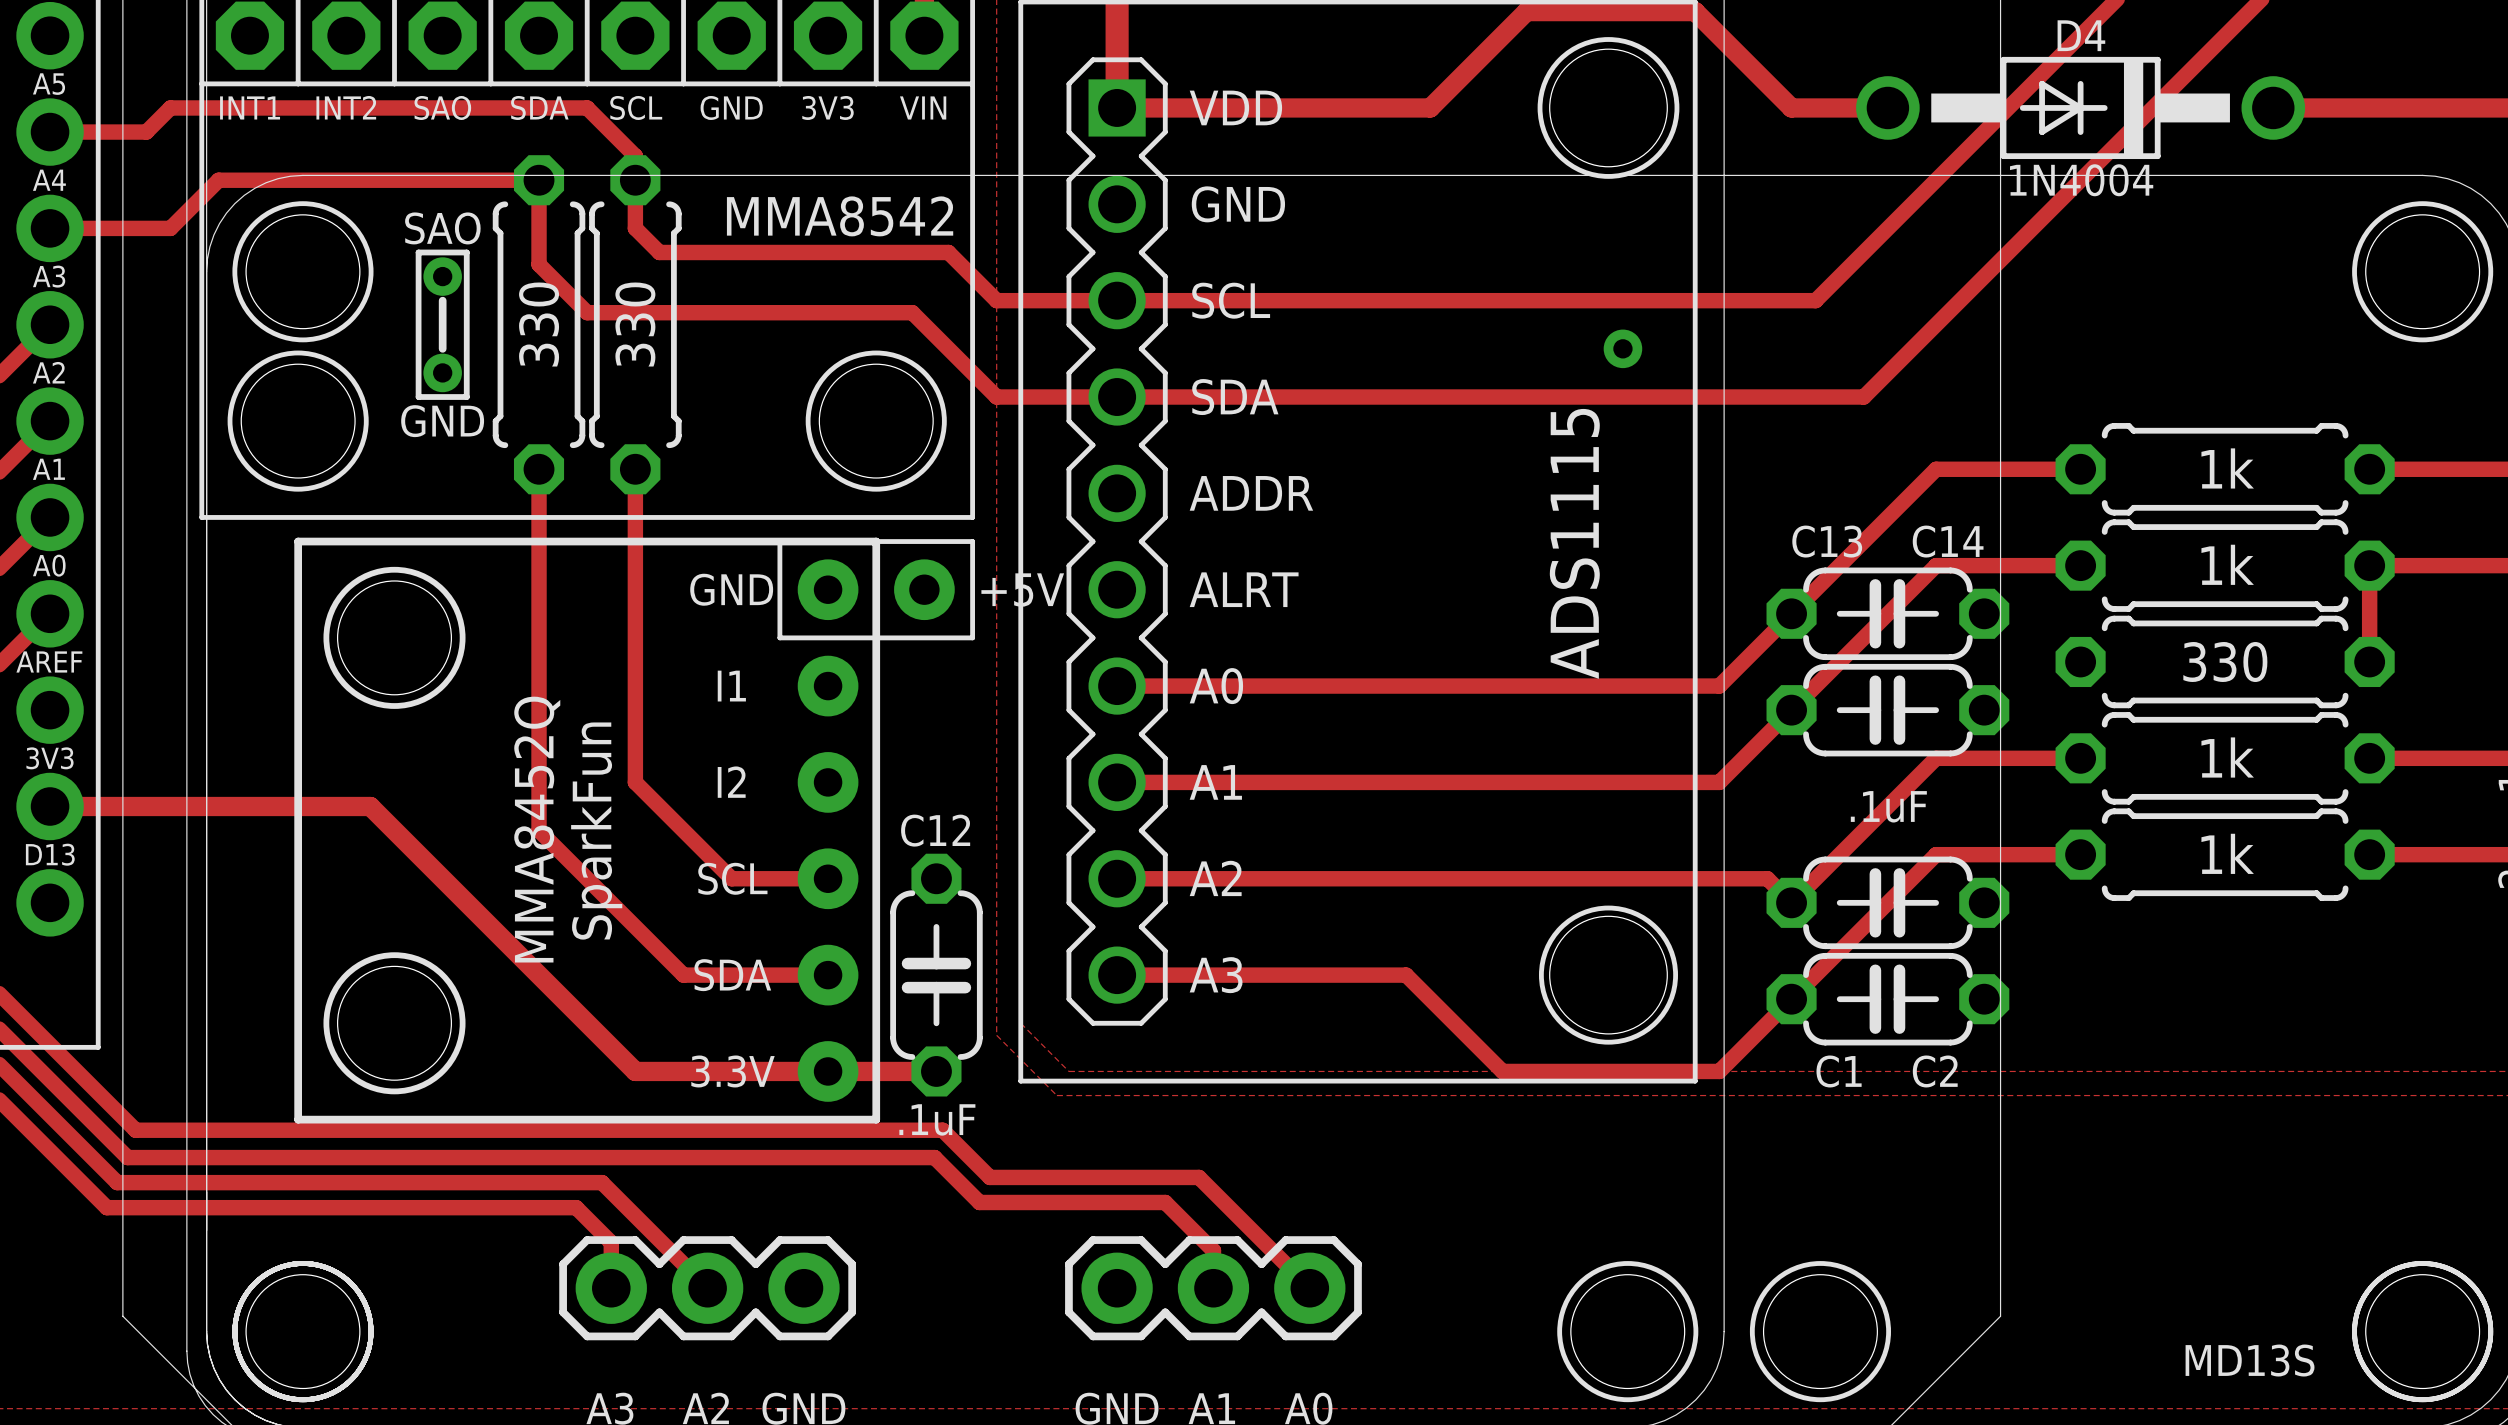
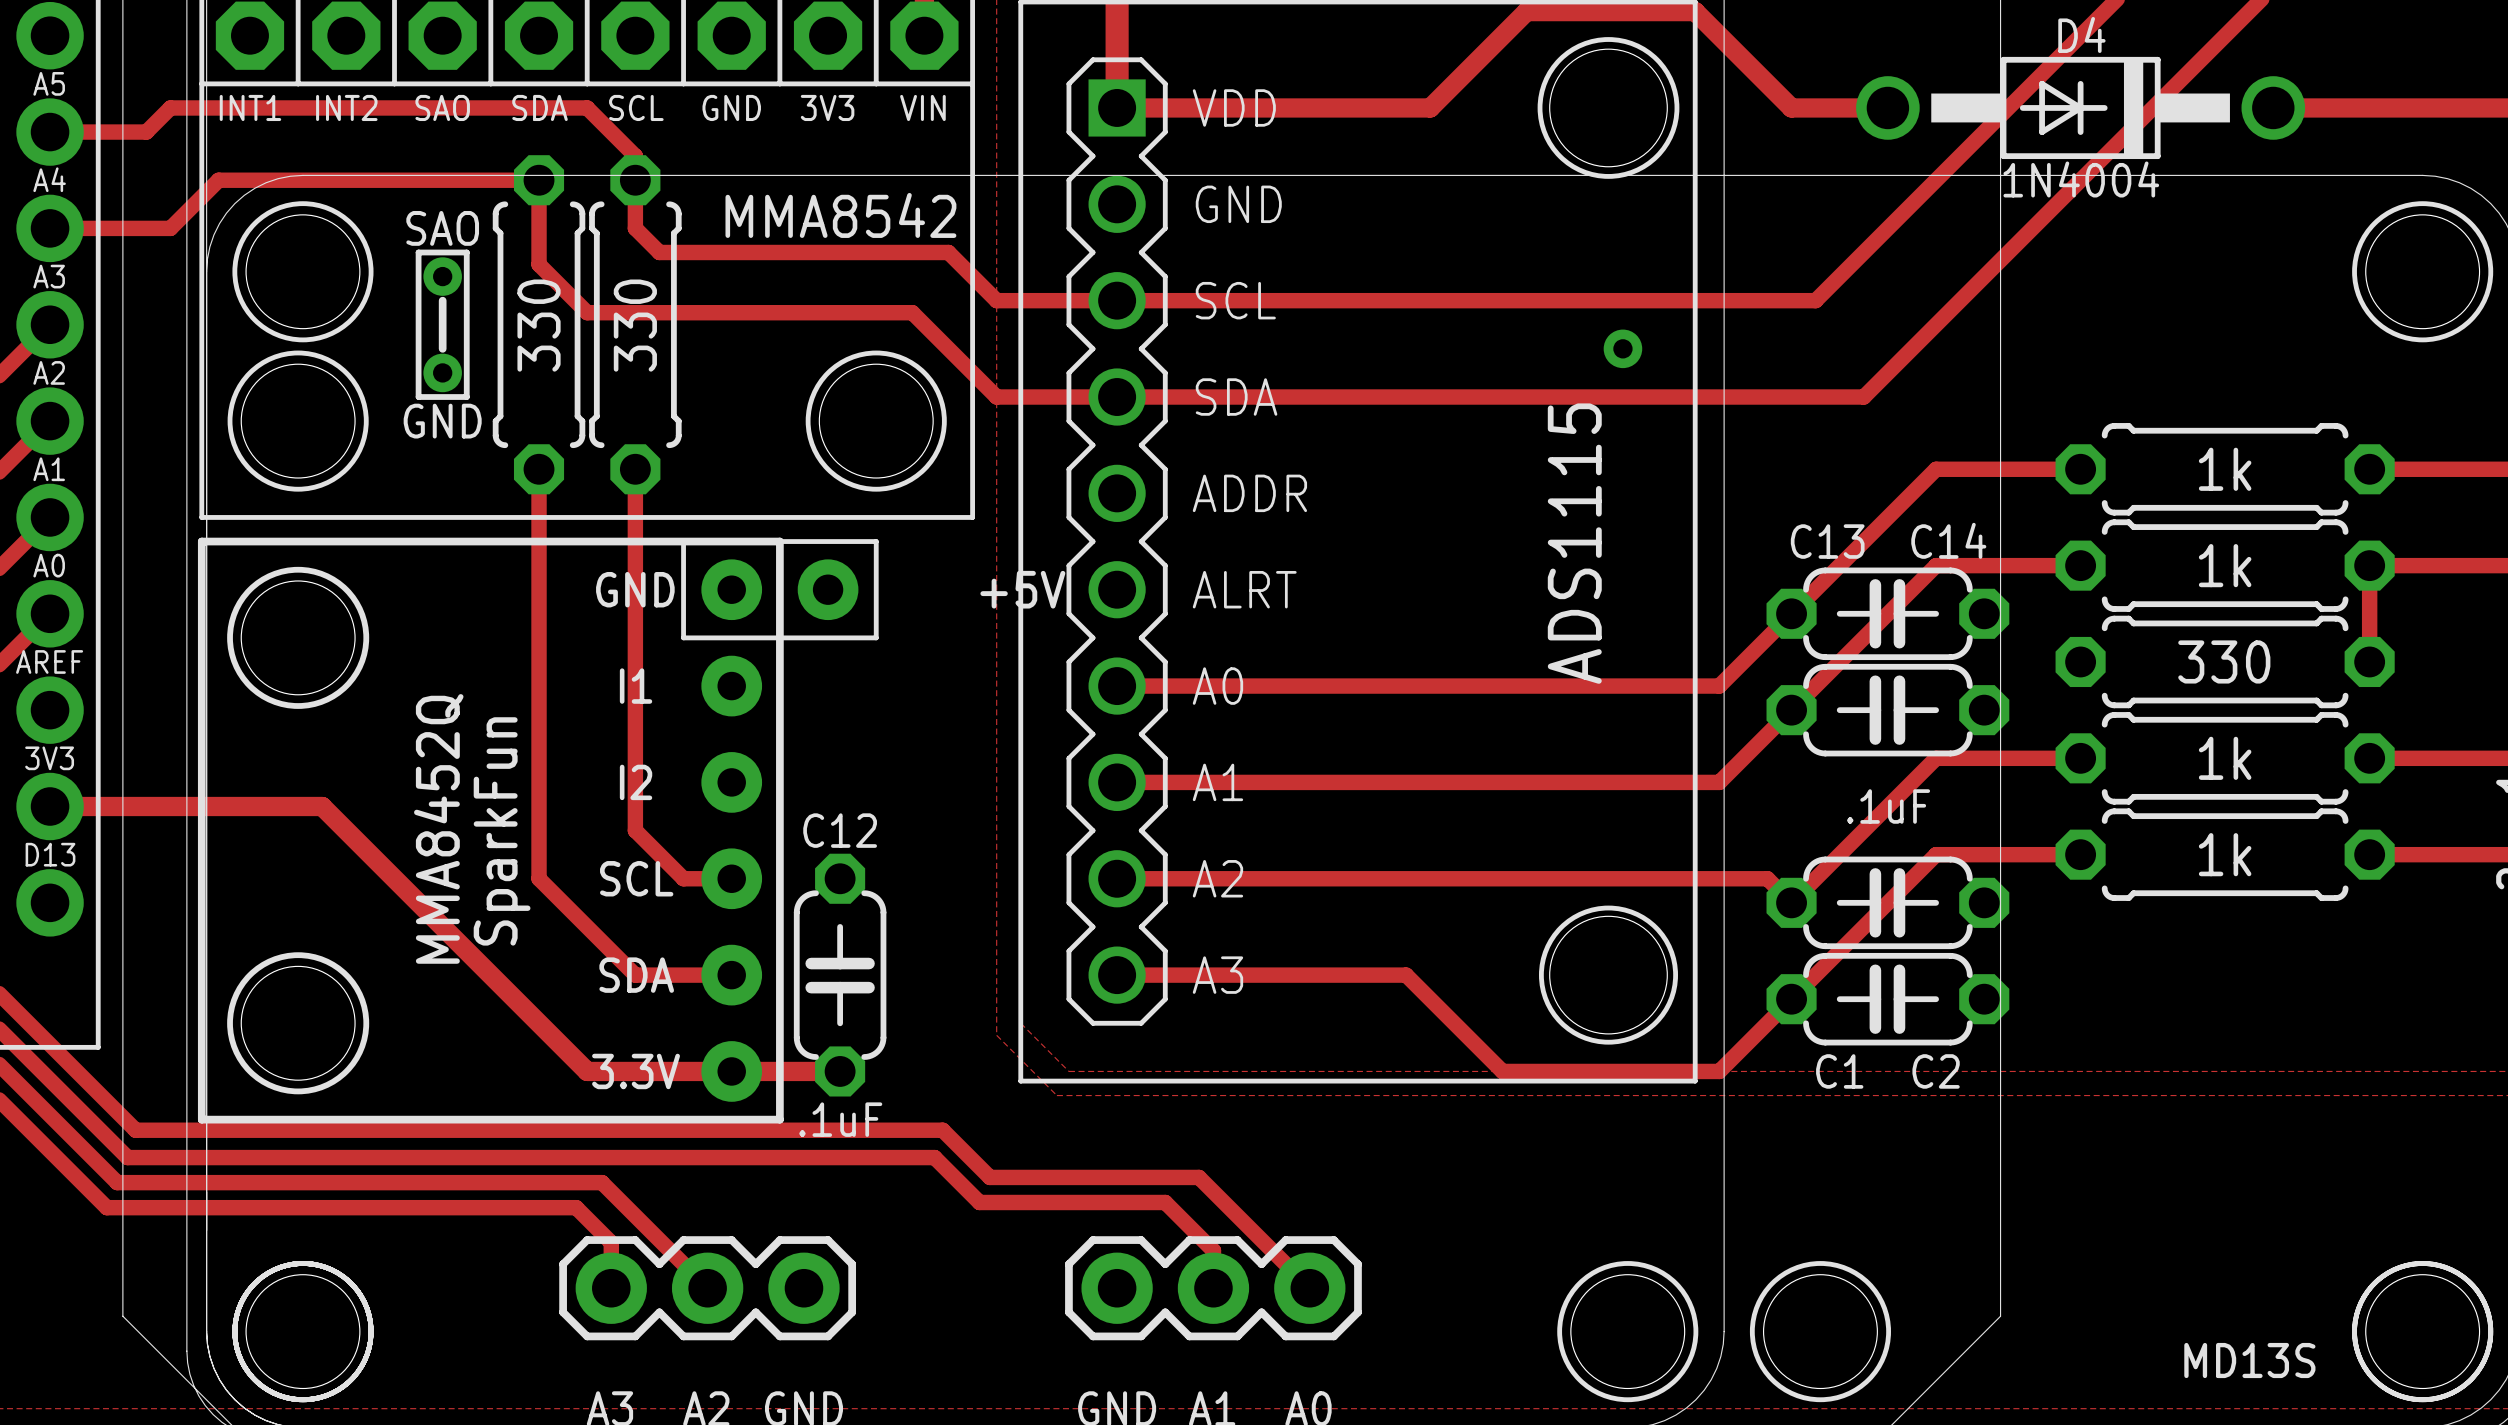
line: (779, 541) (779, 637) -> (683, 541) (683, 637) (779, 637)
line: (876, 541) (972, 541) (972, 637) (876, 637) -> (779, 541) (876, 541) (876, 637)
via position: (924, 589) -> (828, 589)
track: (635, 782) (731, 878) (828, 878) -> (635, 782) (635, 830) (683, 878) (731, 878)
track: (322, 806) (370, 806) (635, 1071) -> (322, 806) (587, 1071) (635, 1071)
track: (539, 830) (683, 975) -> (539, 830) (539, 878) (635, 975) (683, 975)
part position: (587, 830) -> (490, 830)
track: (731, 975) (828, 975) -> none
C12 position: (936, 975) -> (840, 975)
track: (840, 1071) (936, 1071) -> none

